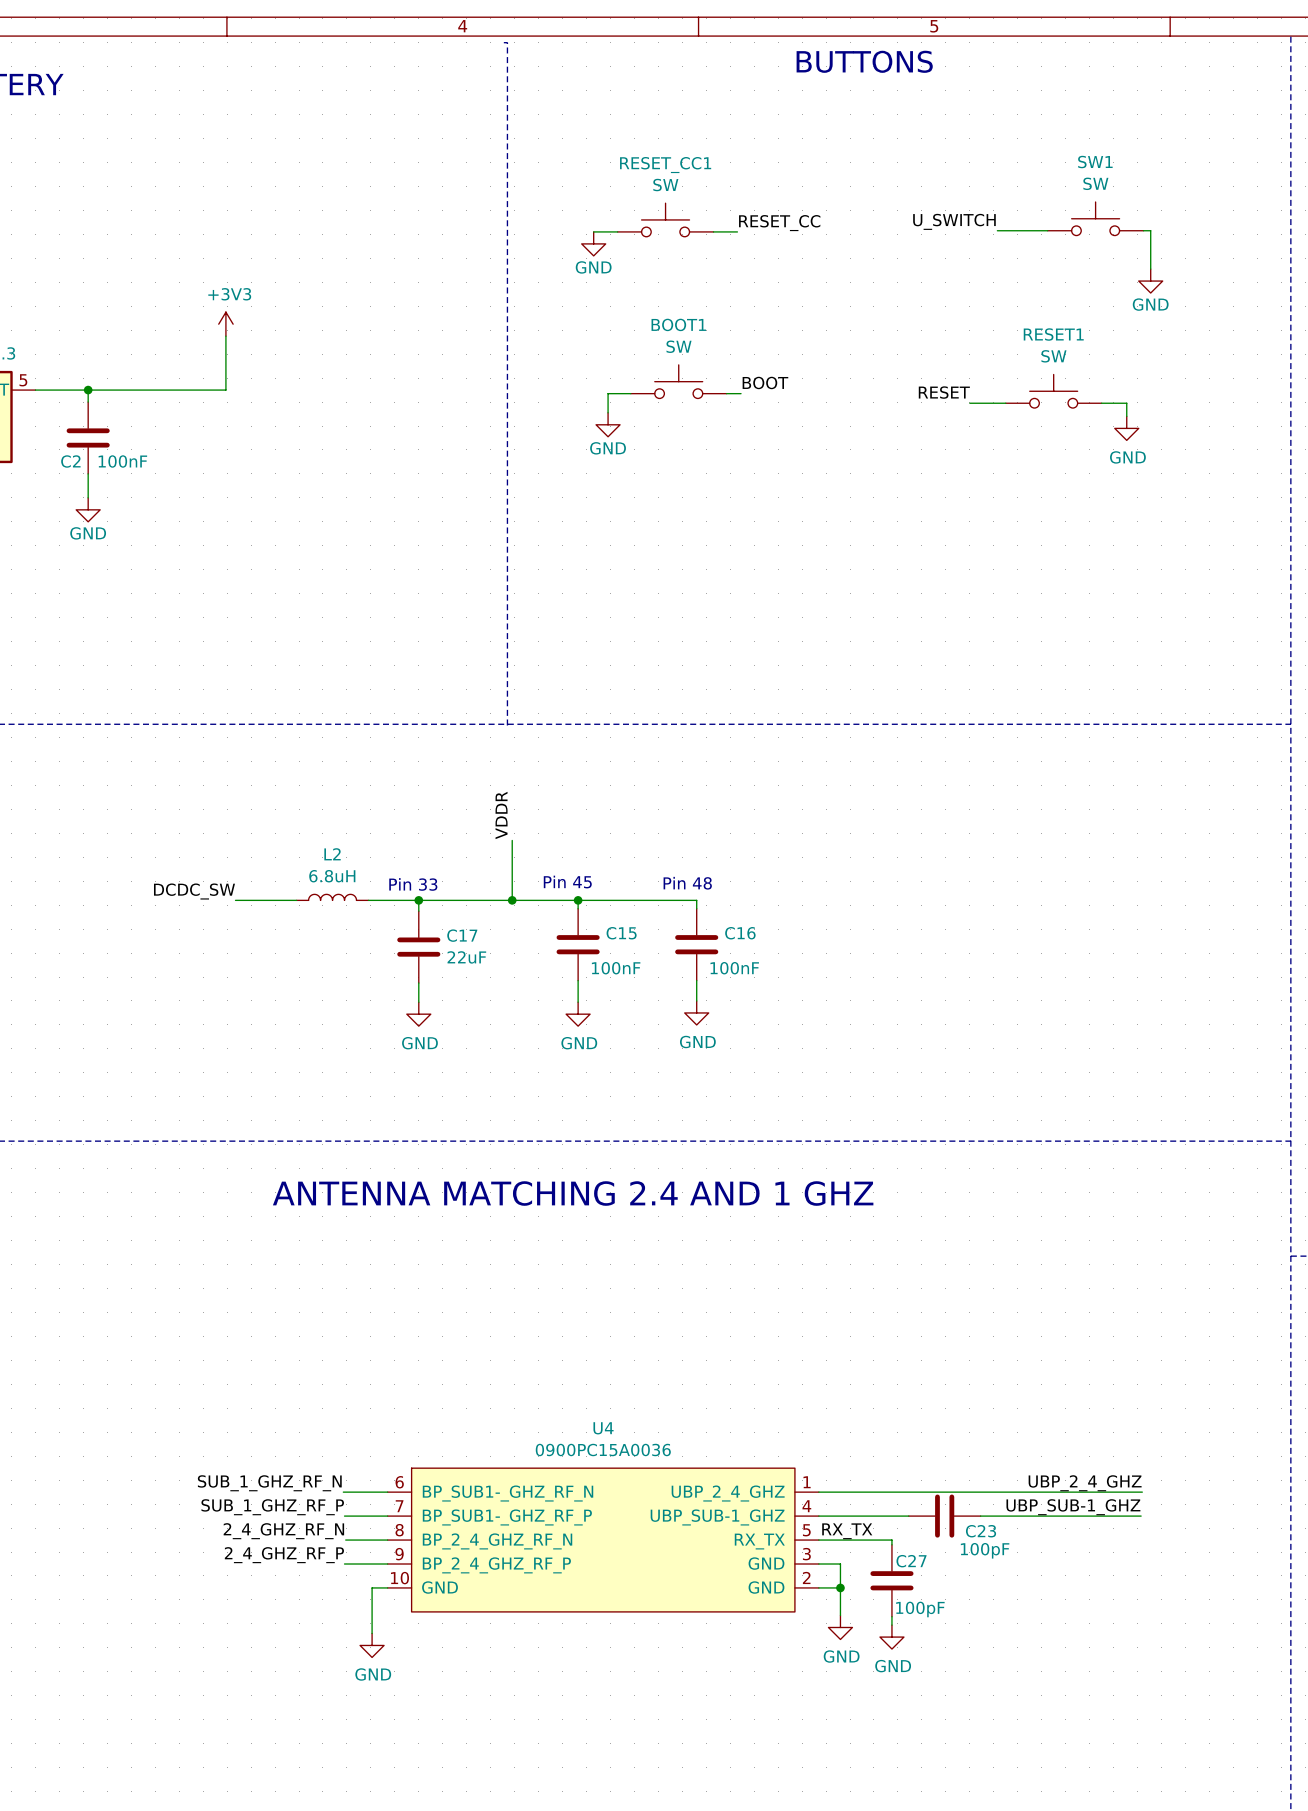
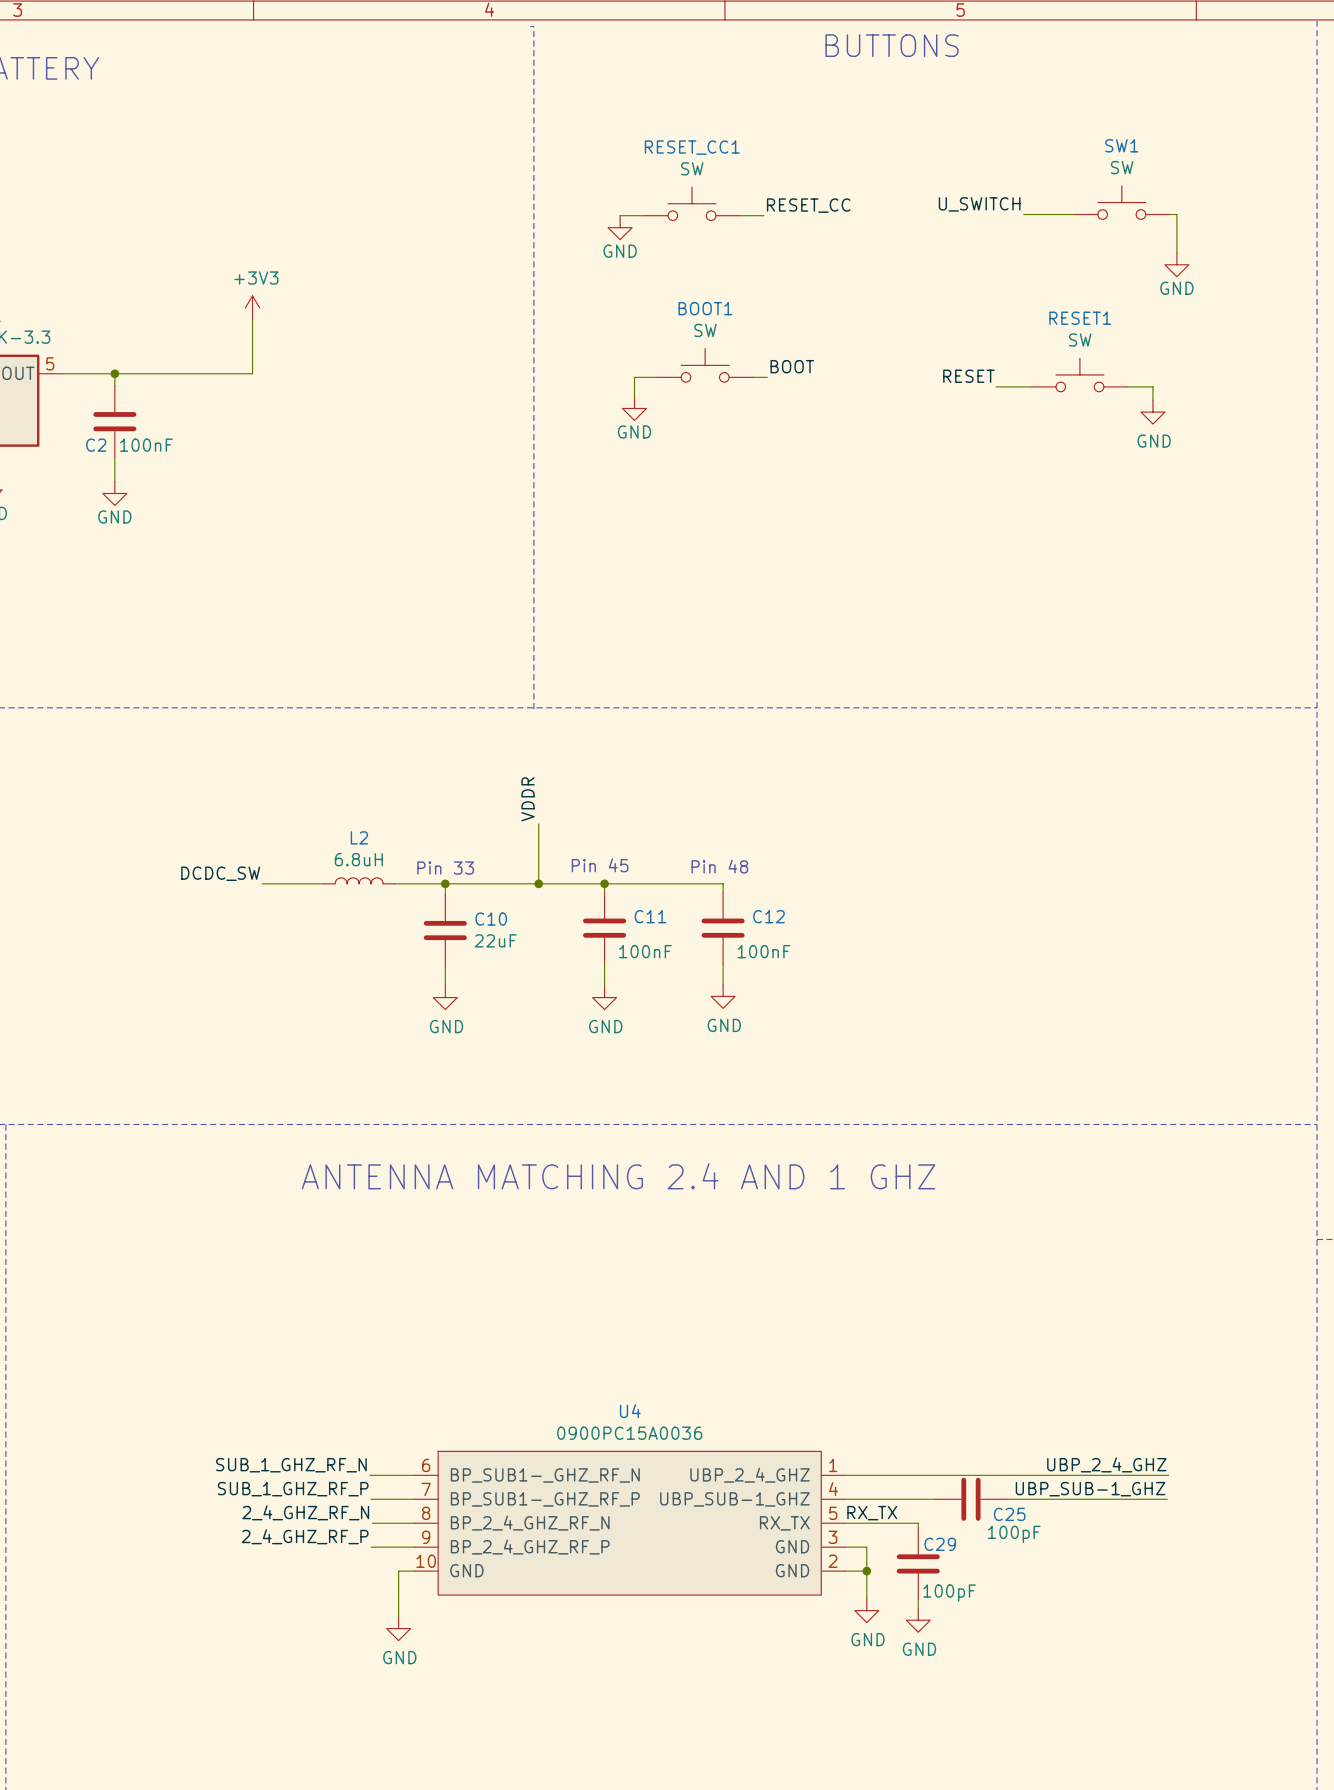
C15 name: C15 (621, 933) -> C11 (650, 916)
C16 name: C16 (740, 933) -> C12 (768, 916)
C17 name: C17 (462, 935) -> C10 (491, 919)
C23 name: C23 (981, 1531) -> C25 (1009, 1514)
C27 name: C27 (911, 1561) -> C29 (940, 1544)

